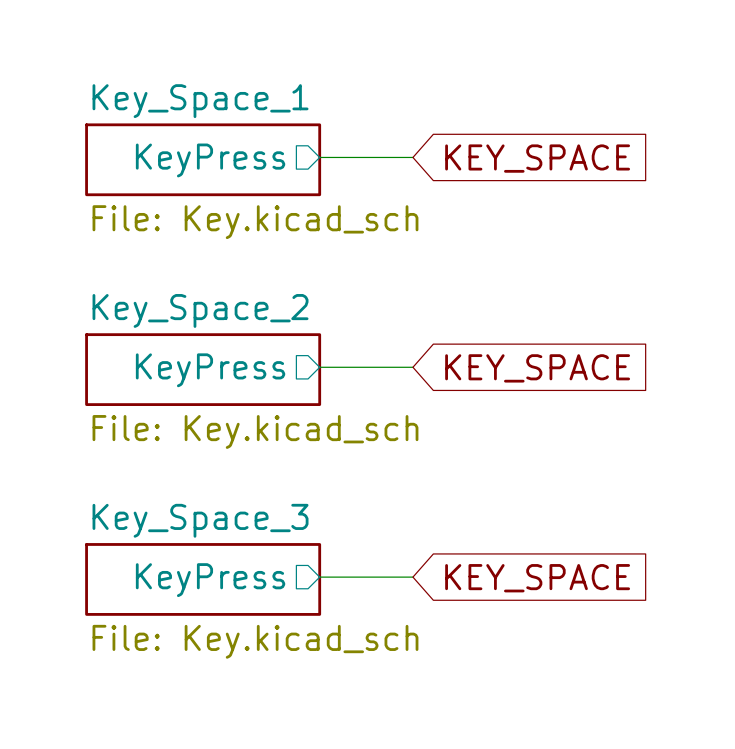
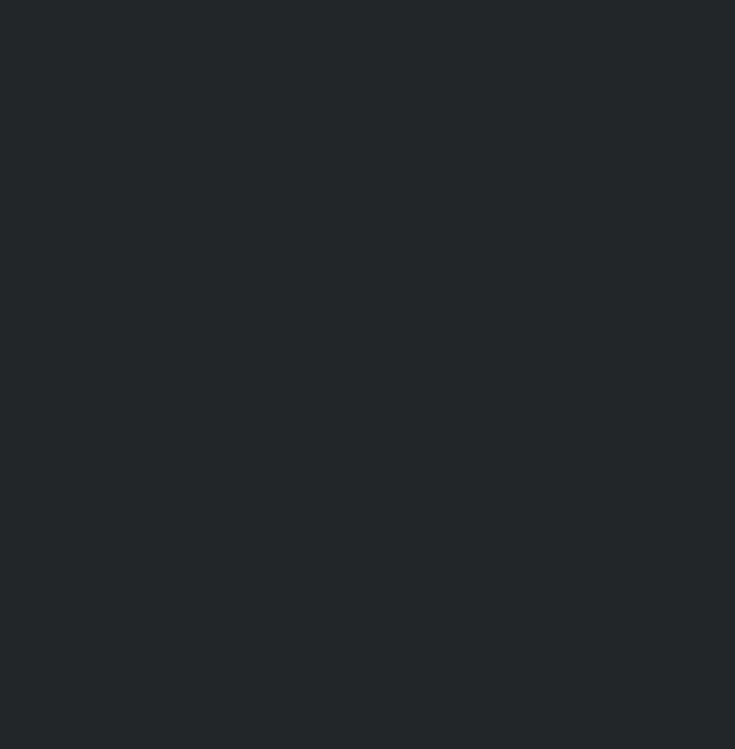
wire: (319, 157) (412, 157) -> none
global label: KEY_SPACE (537, 158) -> none
sheet Key_Space_1: File: Key.kicad_sch (203, 159) -> none
sheet pin: KeyPress (210, 160) -> none
wire: (319, 367) (412, 367) -> none
global label: KEY_SPACE (537, 368) -> none
sheet Key_Space_2: File: Key.kicad_sch (203, 369) -> none
sheet pin: KeyPress (210, 370) -> none
wire: (319, 577) (412, 577) -> none
global label: KEY_SPACE (537, 578) -> none
sheet Key_Space_3: File: Key.kicad_sch (203, 579) -> none
sheet pin: KeyPress (210, 580) -> none

